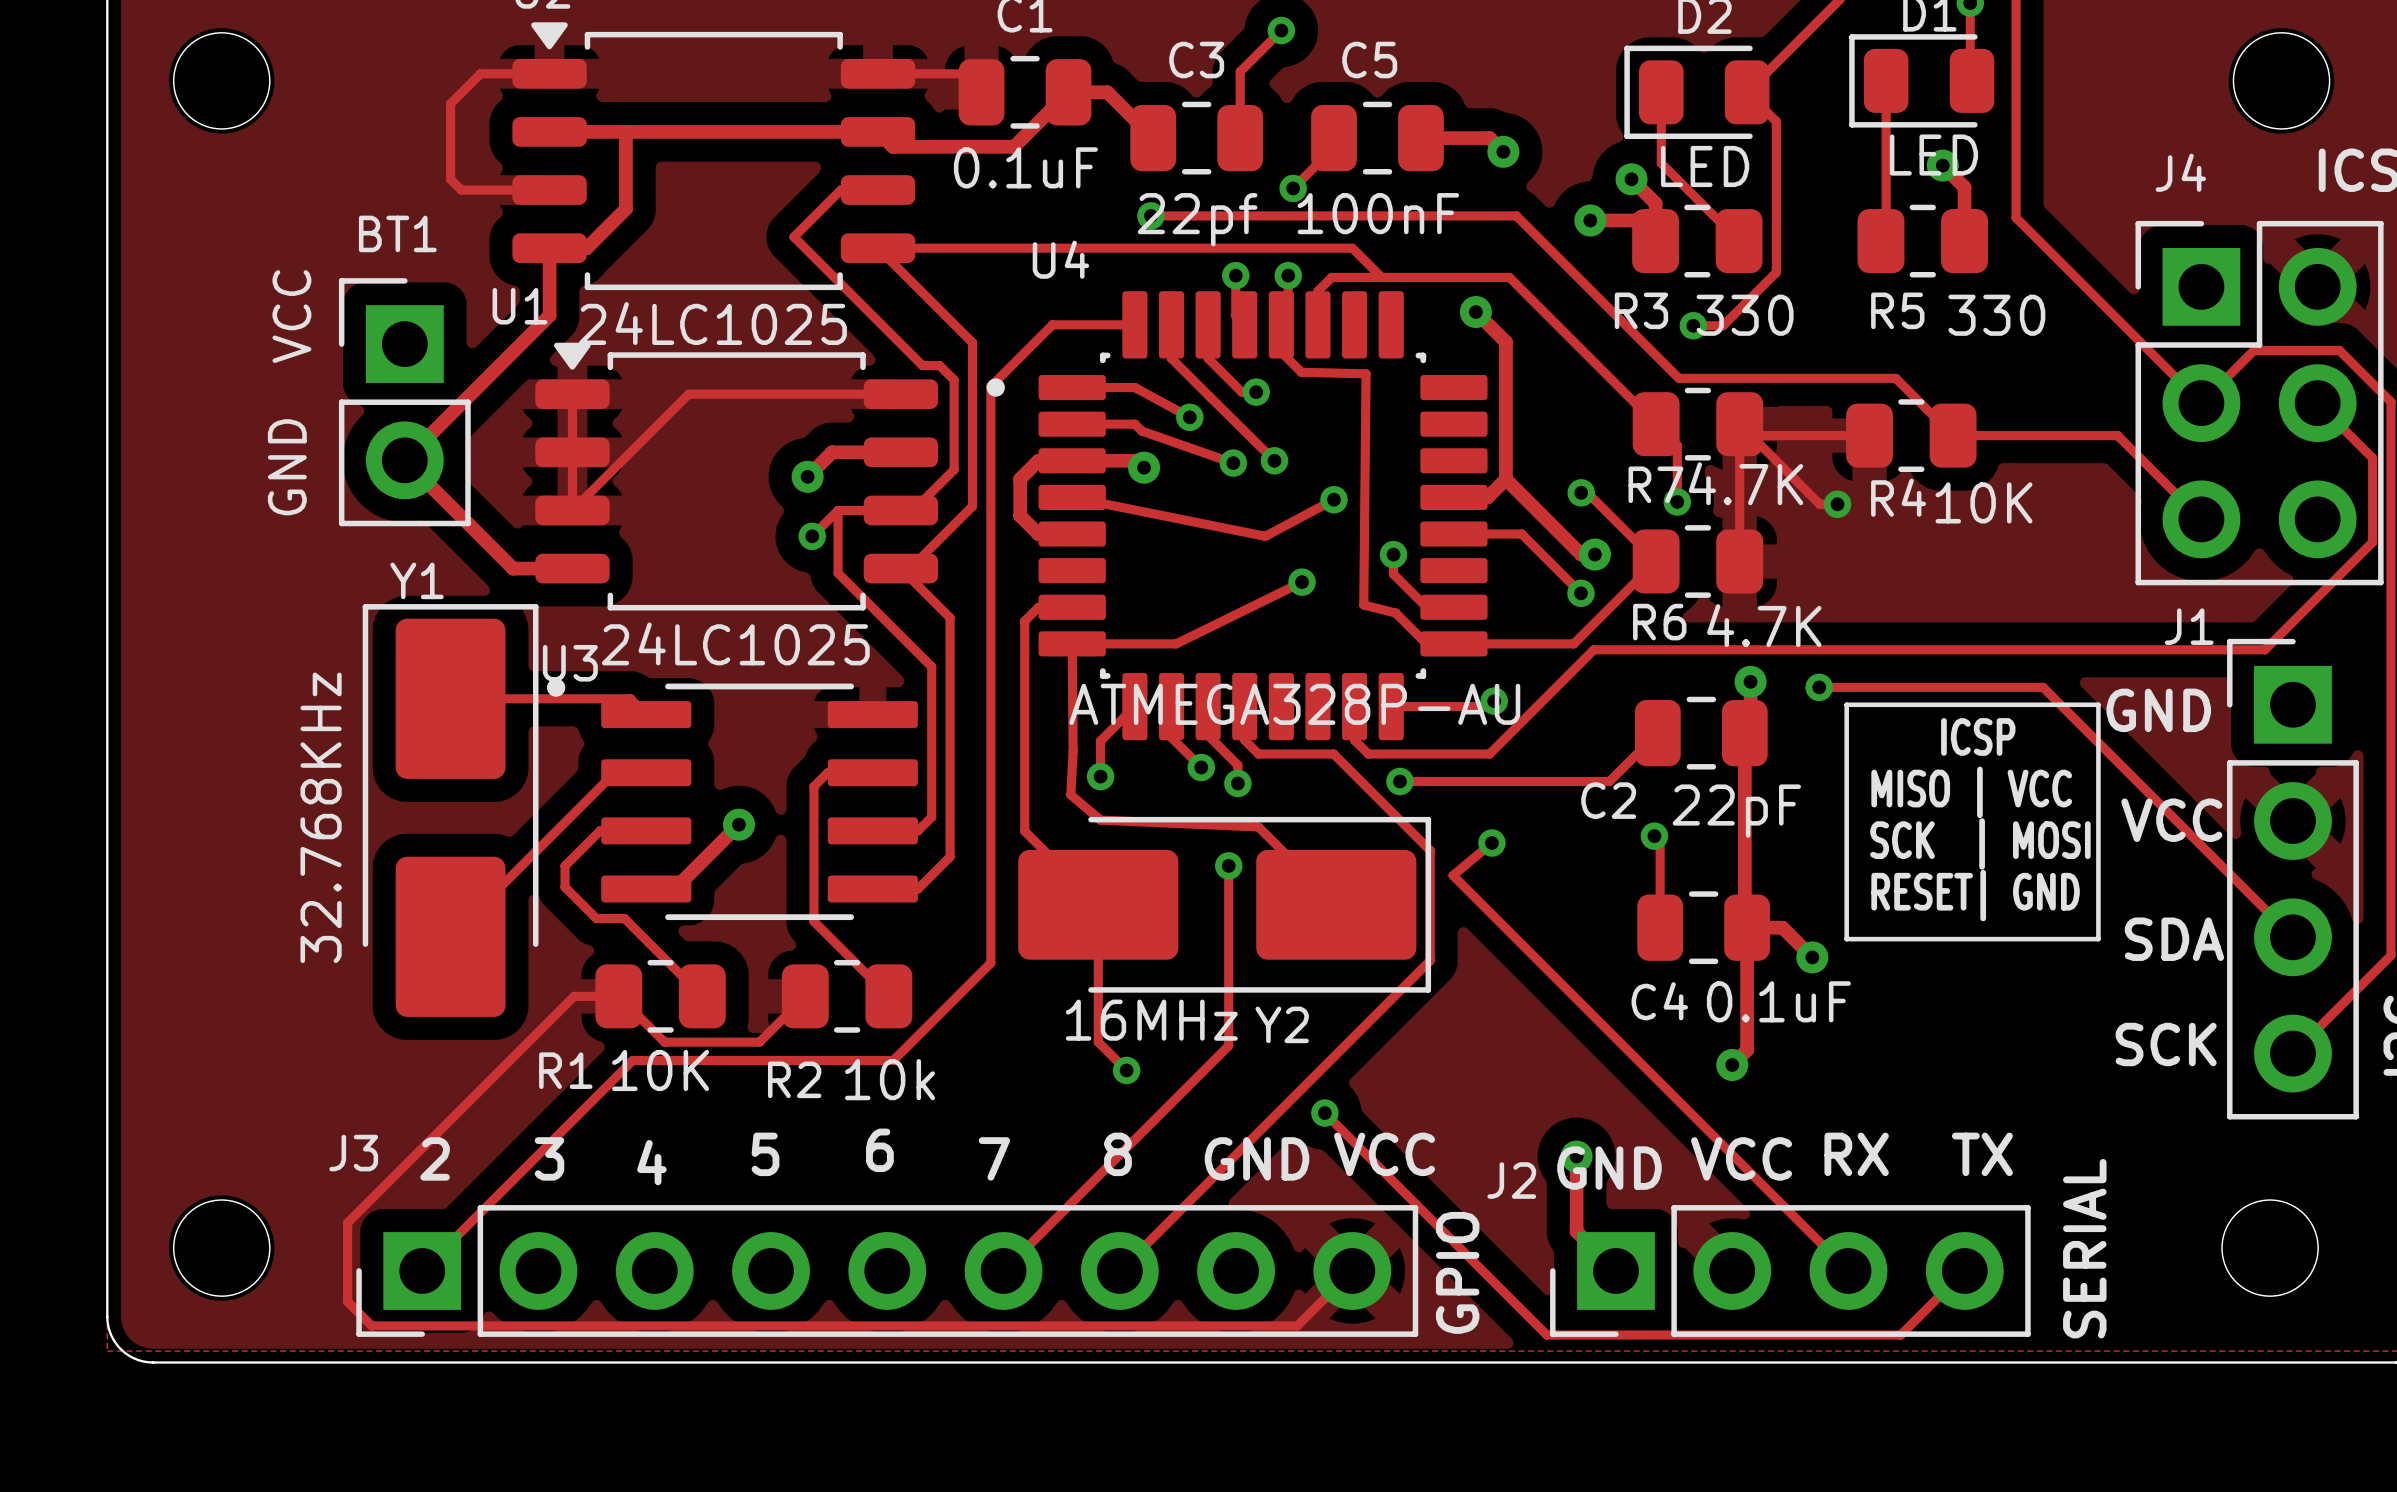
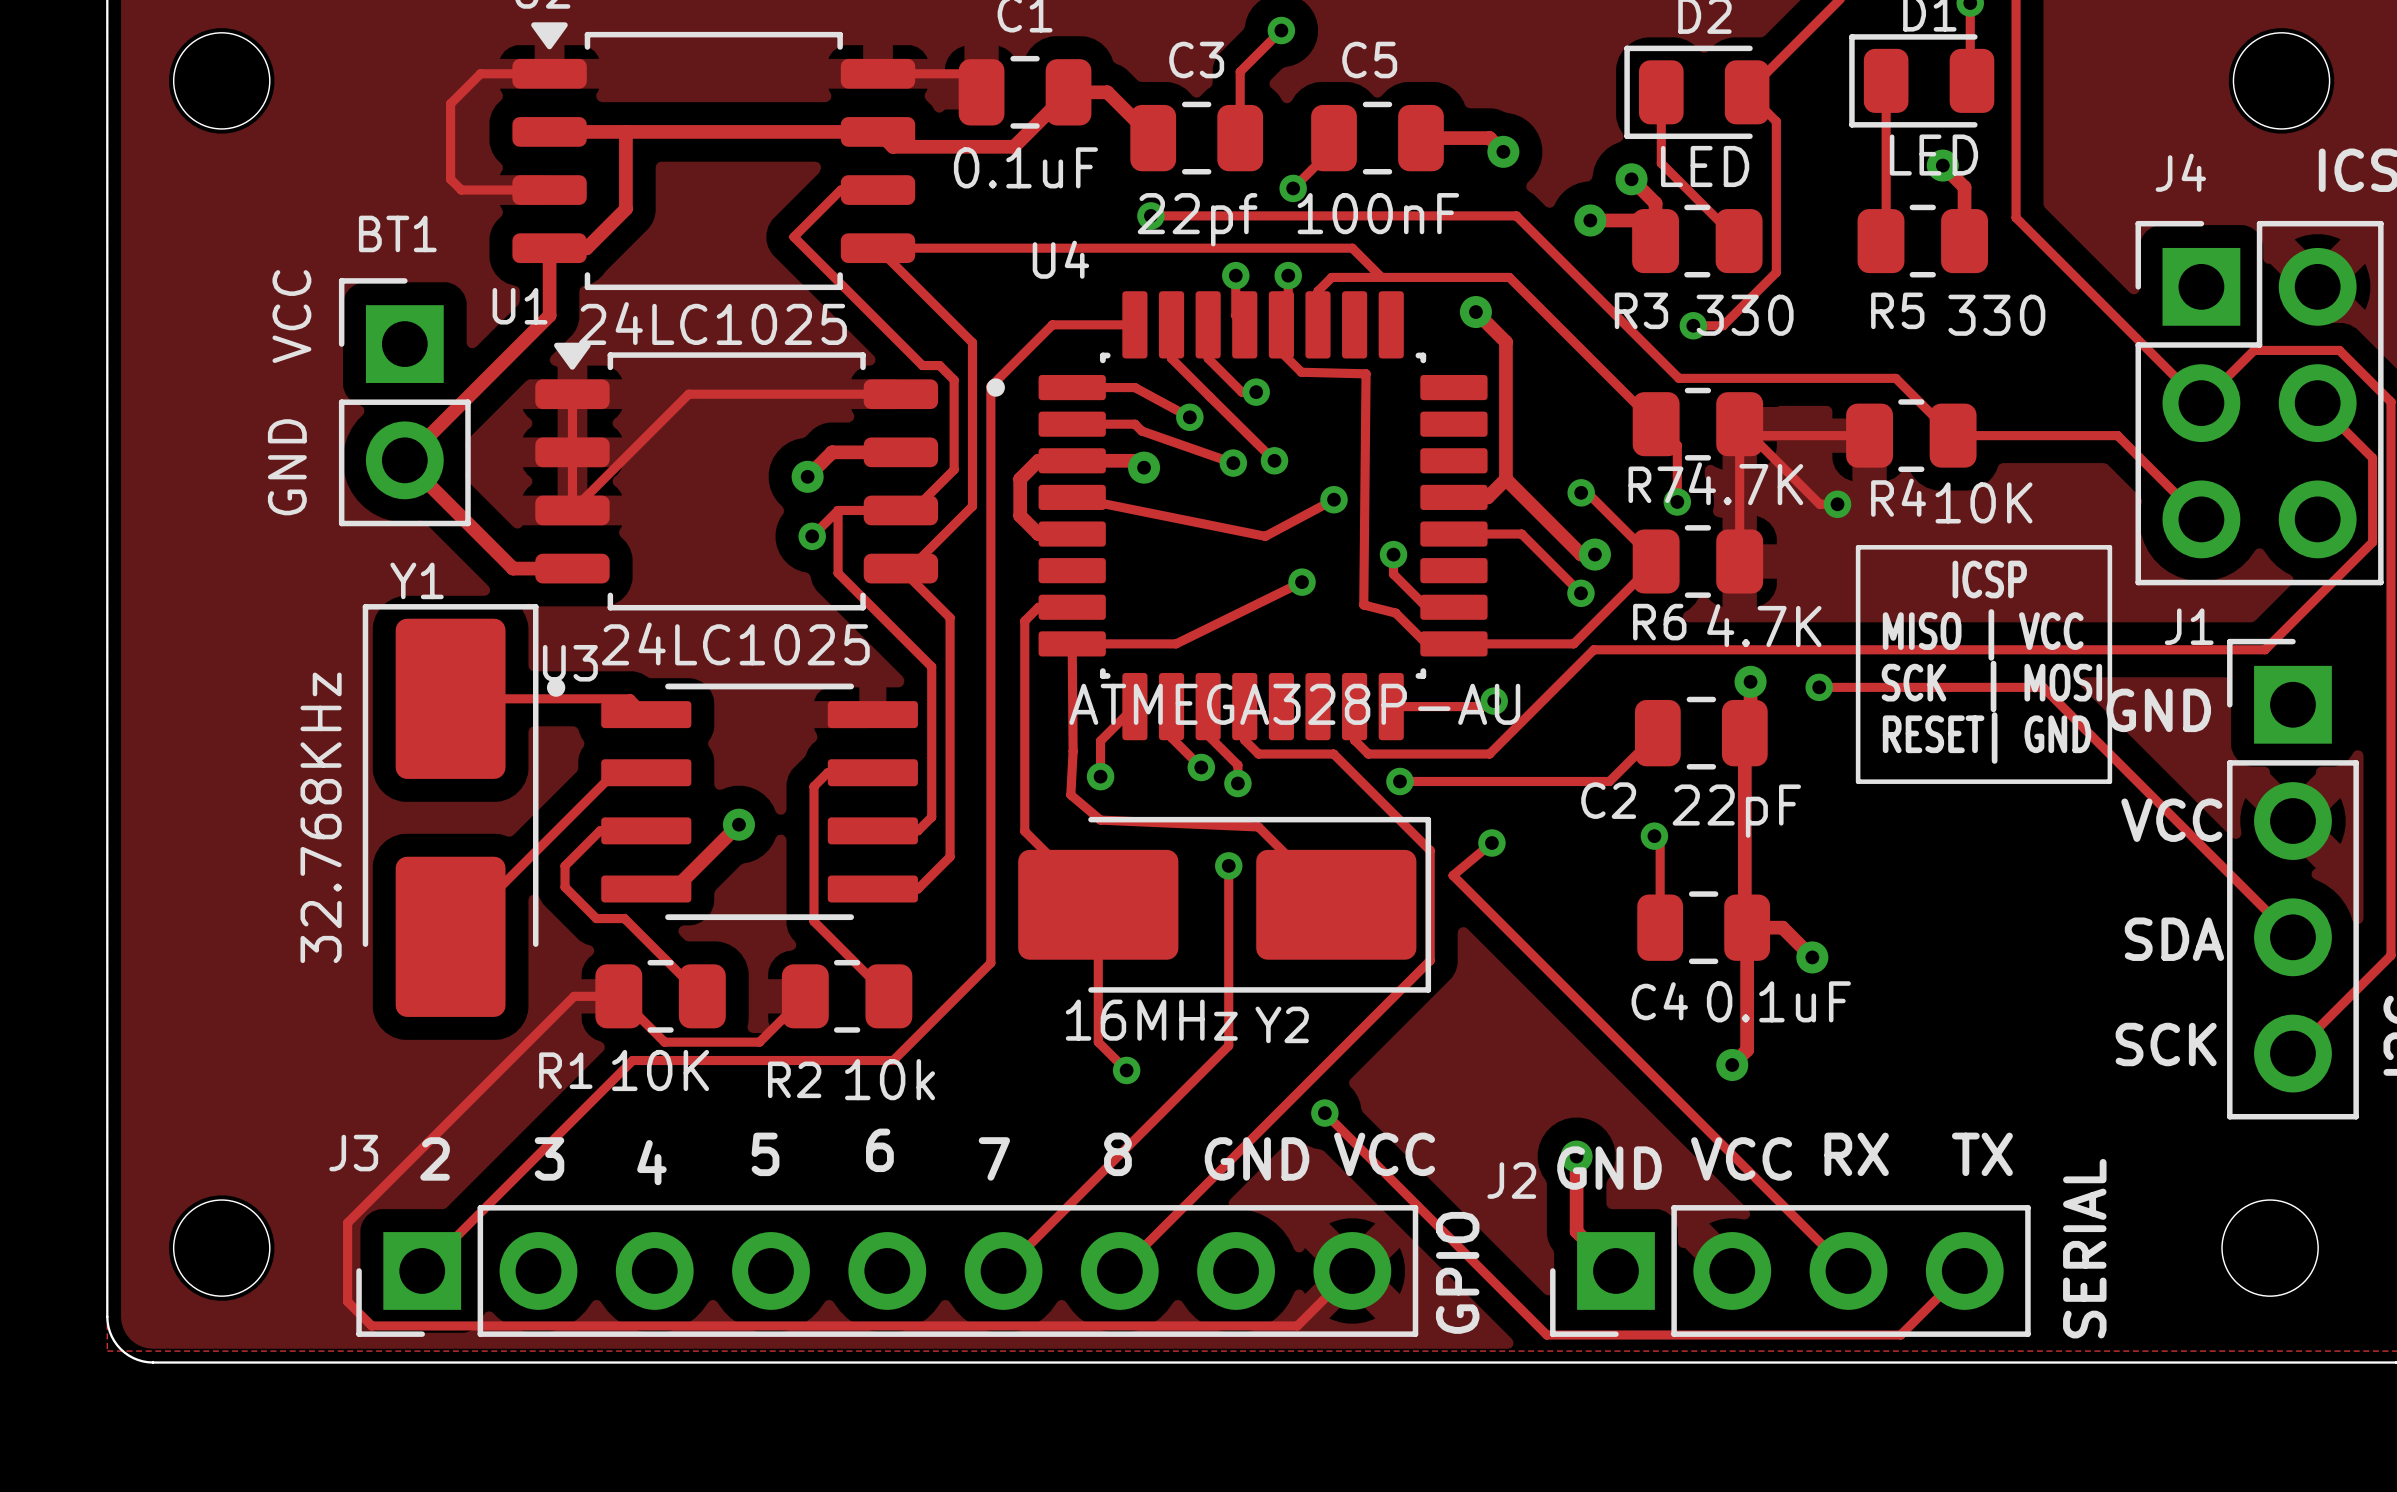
line: (1846, 704) (2098, 704) (2098, 939) (1846, 939) (1846, 704) -> (1858, 547) (2109, 547) (2109, 781) (1858, 781) (1858, 547)
text position: ICSP (1978, 736) -> ICSP (1989, 579)
text position: MISO | VCC (1971, 792) -> MISO | VCC (1983, 634)
text position: SCK | MOSI (1980, 843) -> SCK | MOSI (1991, 686)
text position: RESET| GND (1975, 895) -> RESET| GND (1987, 738)

